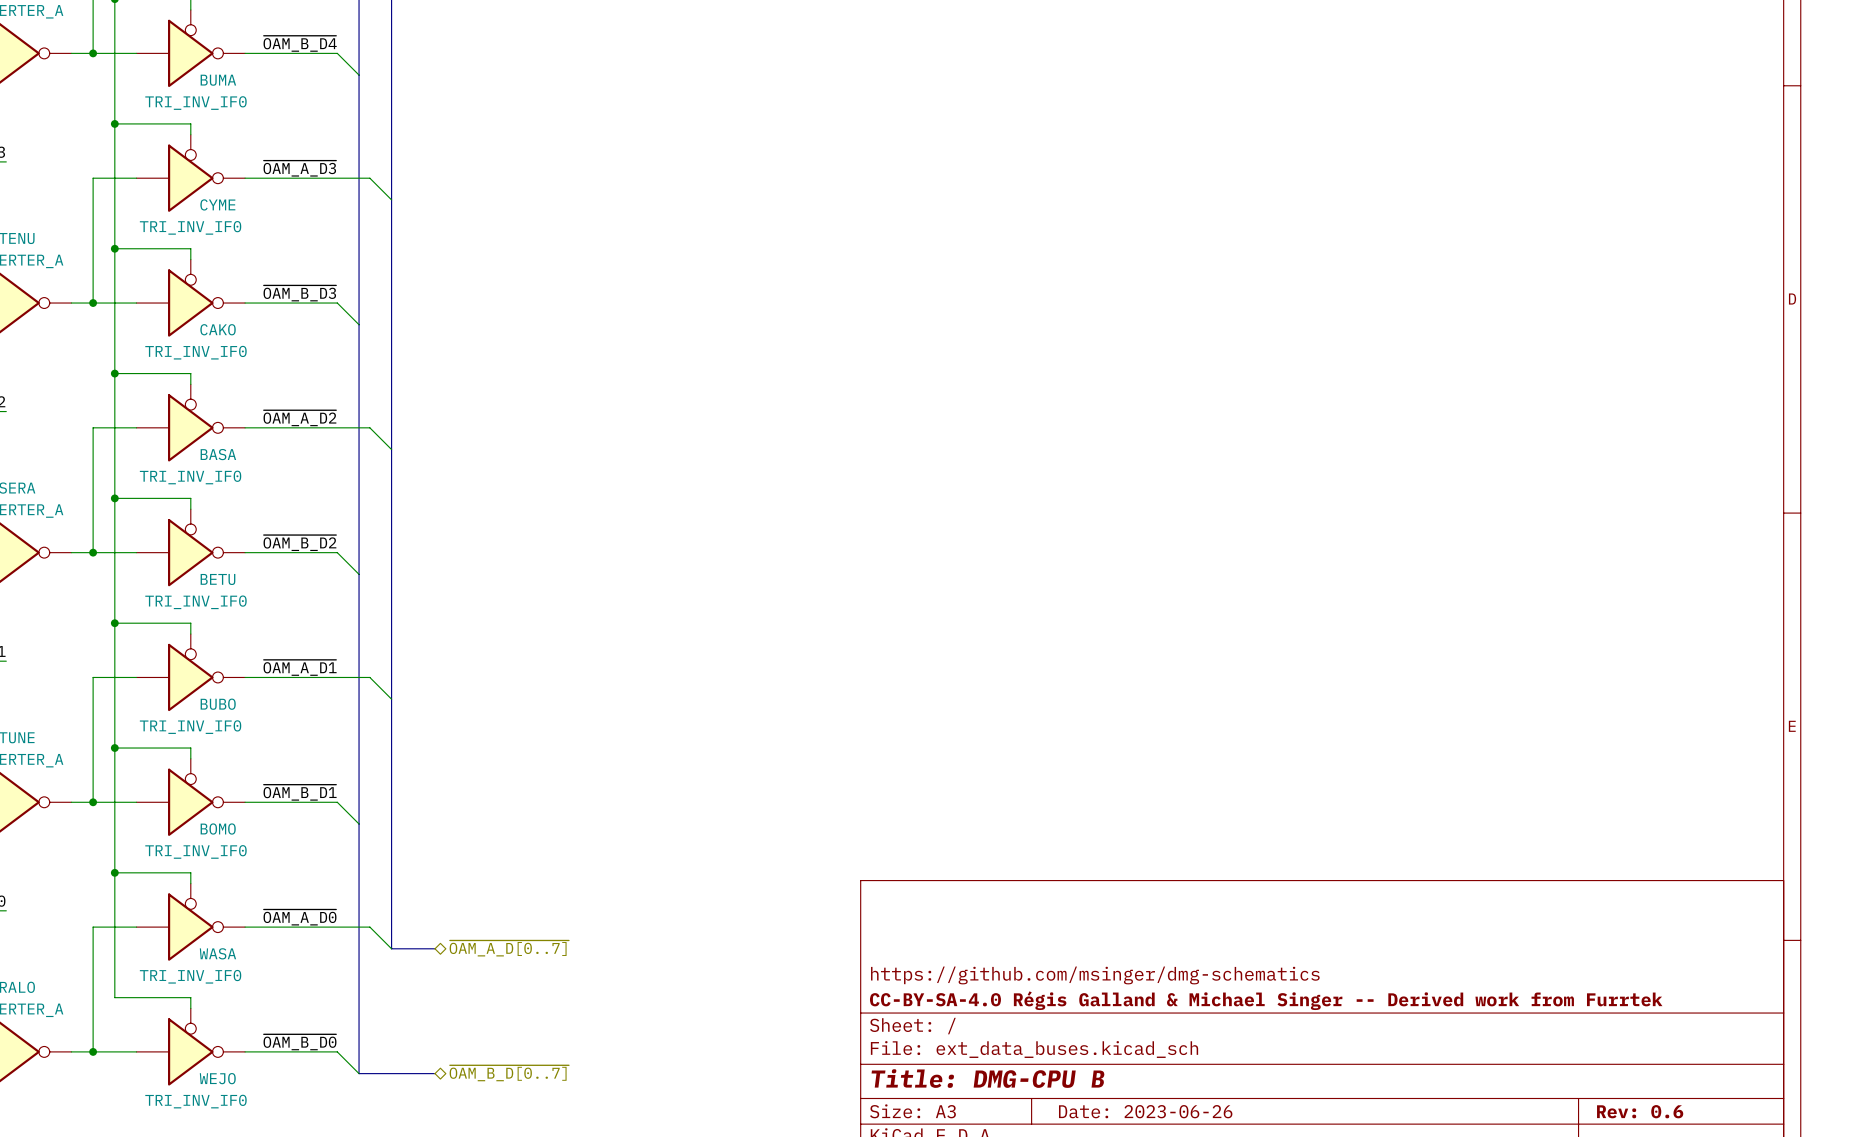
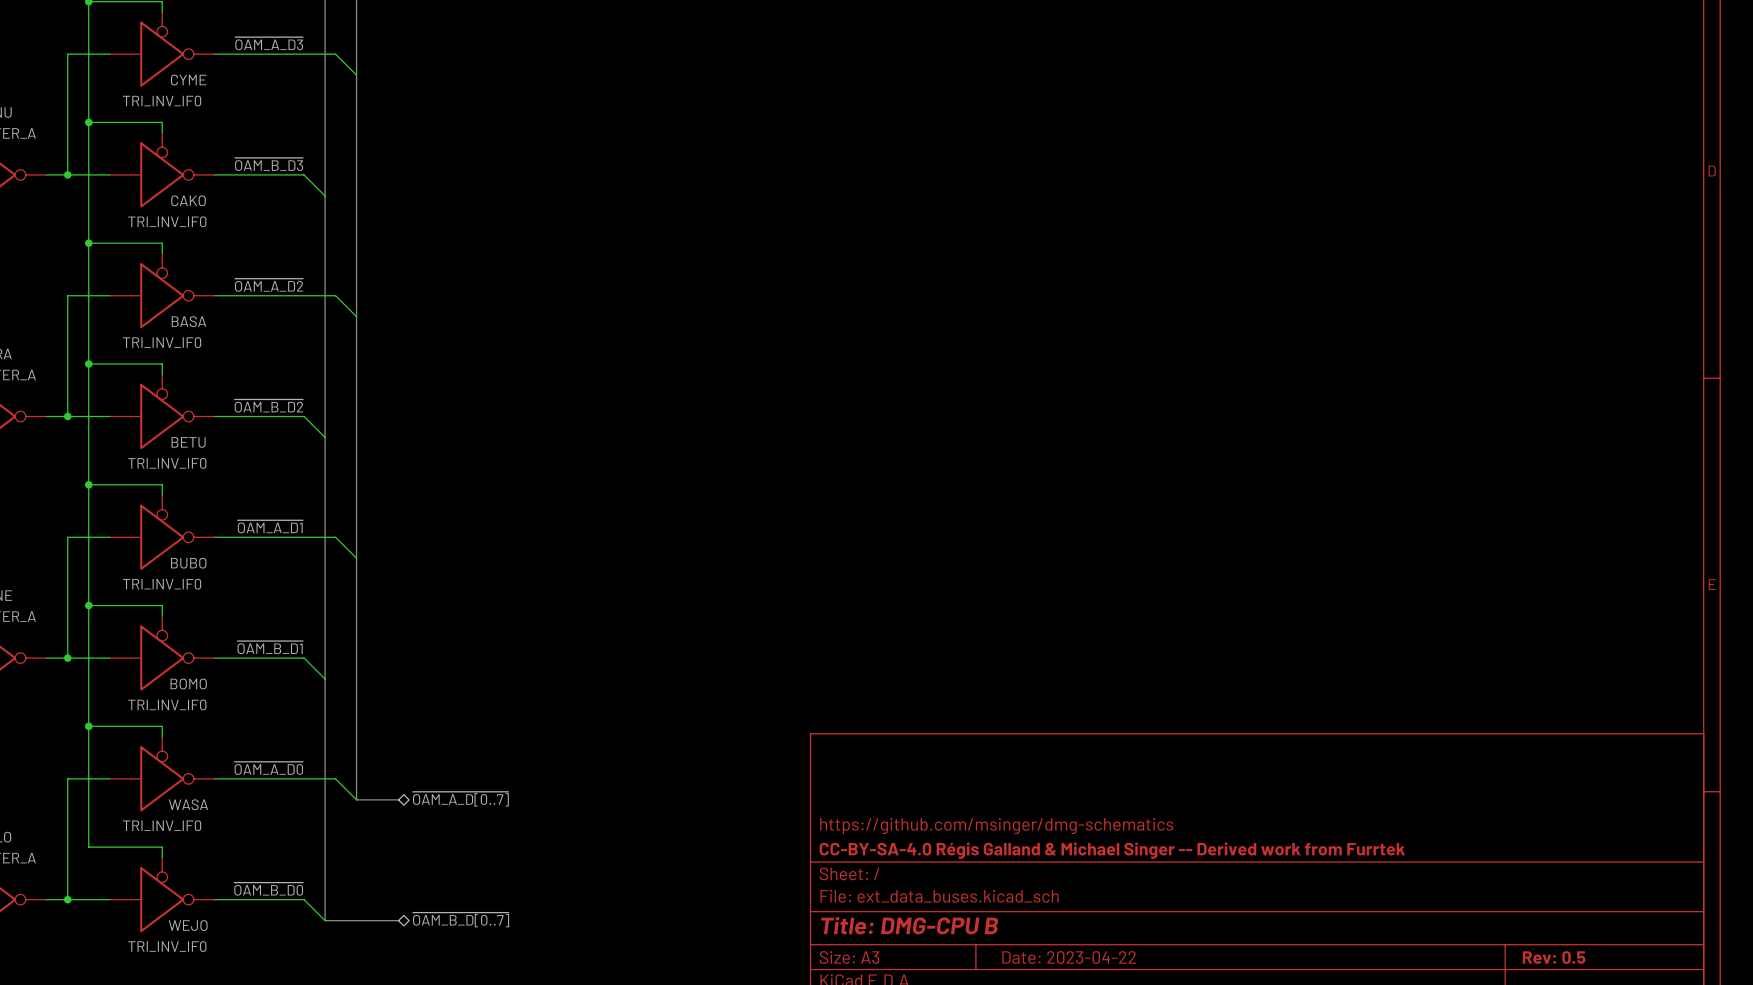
title block: Date: 2023-06-26 (1145, 1111) -> Date: 2023-04-22 (1069, 957)
title block: Rev: 0.6 (1640, 1111) -> Rev: 0.5 (1554, 957)

